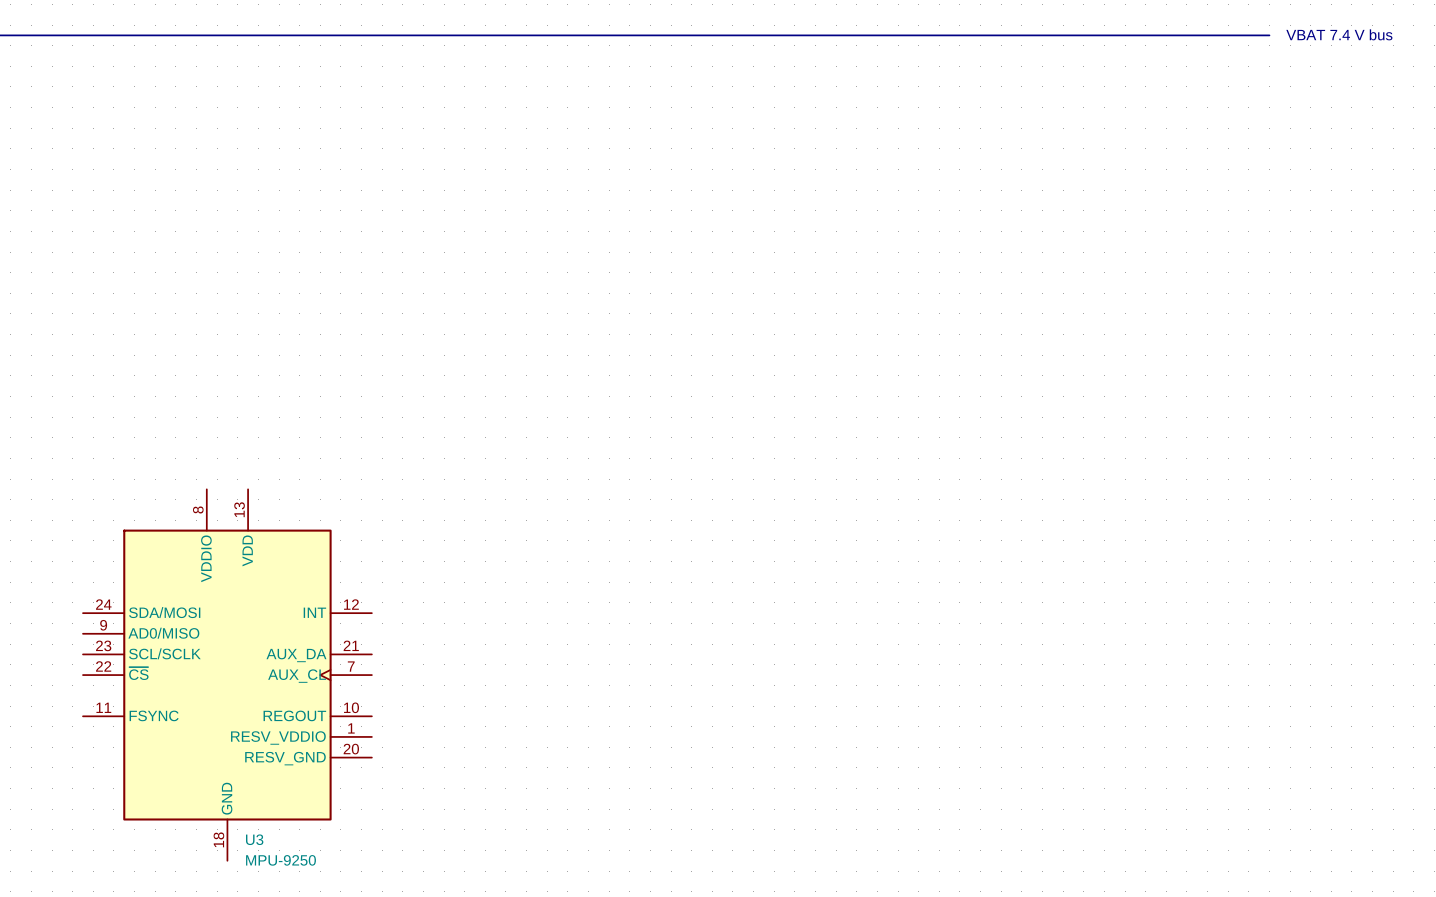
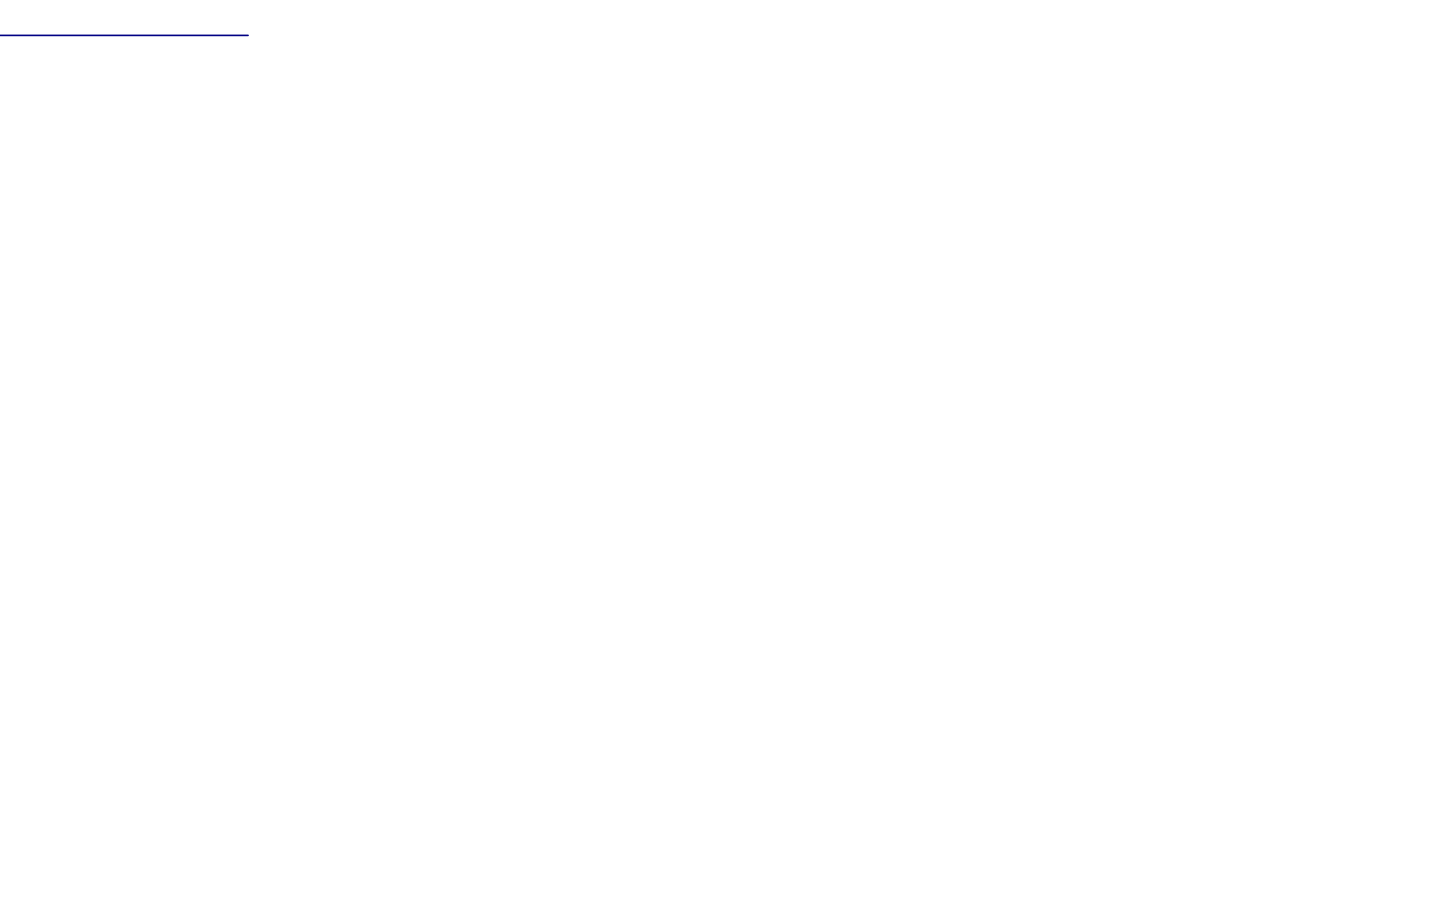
text: VBAT 7.4 V bus (1339, 34) -> none
bus: (248, 35) (1269, 35) -> none
U3: MPU-9250 (227, 675) -> none

